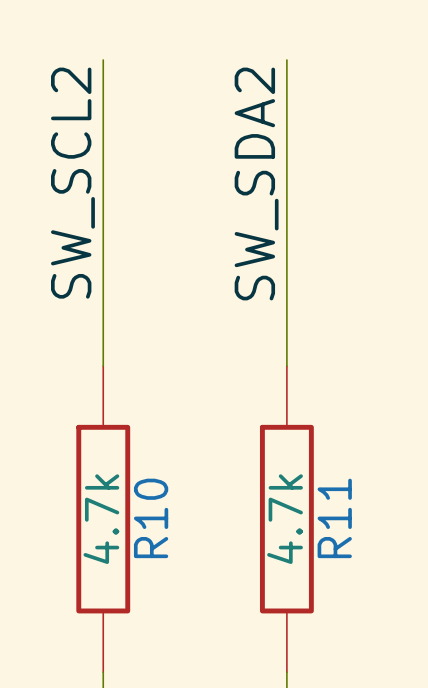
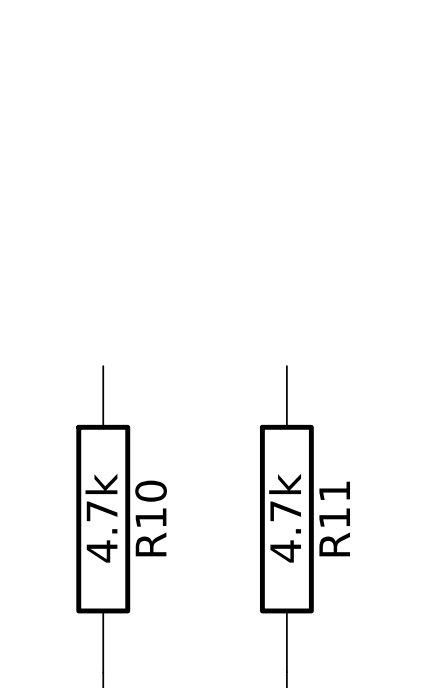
wire: (103, 60) (103, 366) -> none
wire: (286, 60) (286, 366) -> none
label: SW_SCL2 (72, 183) -> none
label: SW_SDA2 (256, 183) -> none

